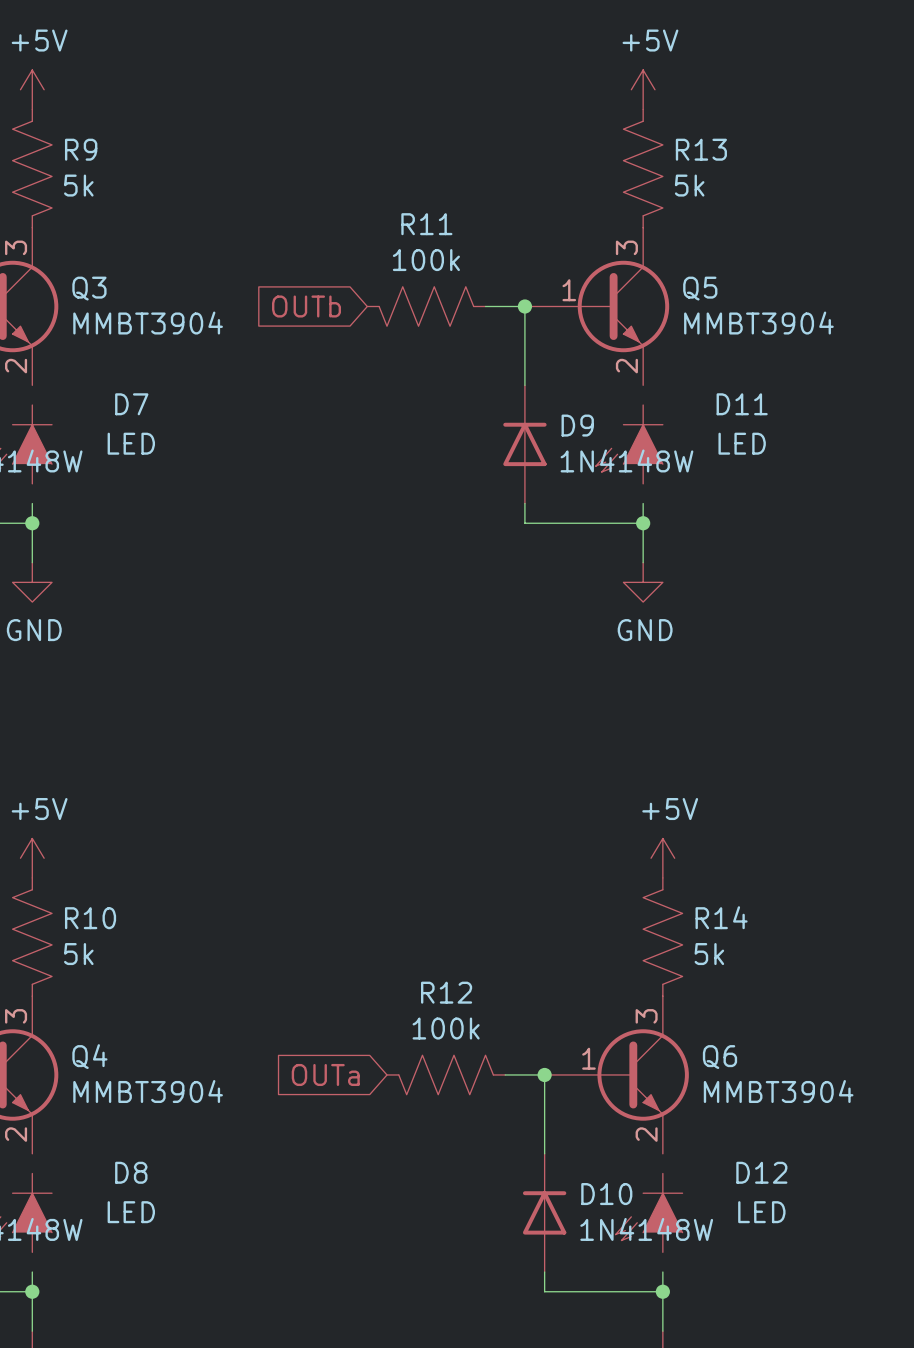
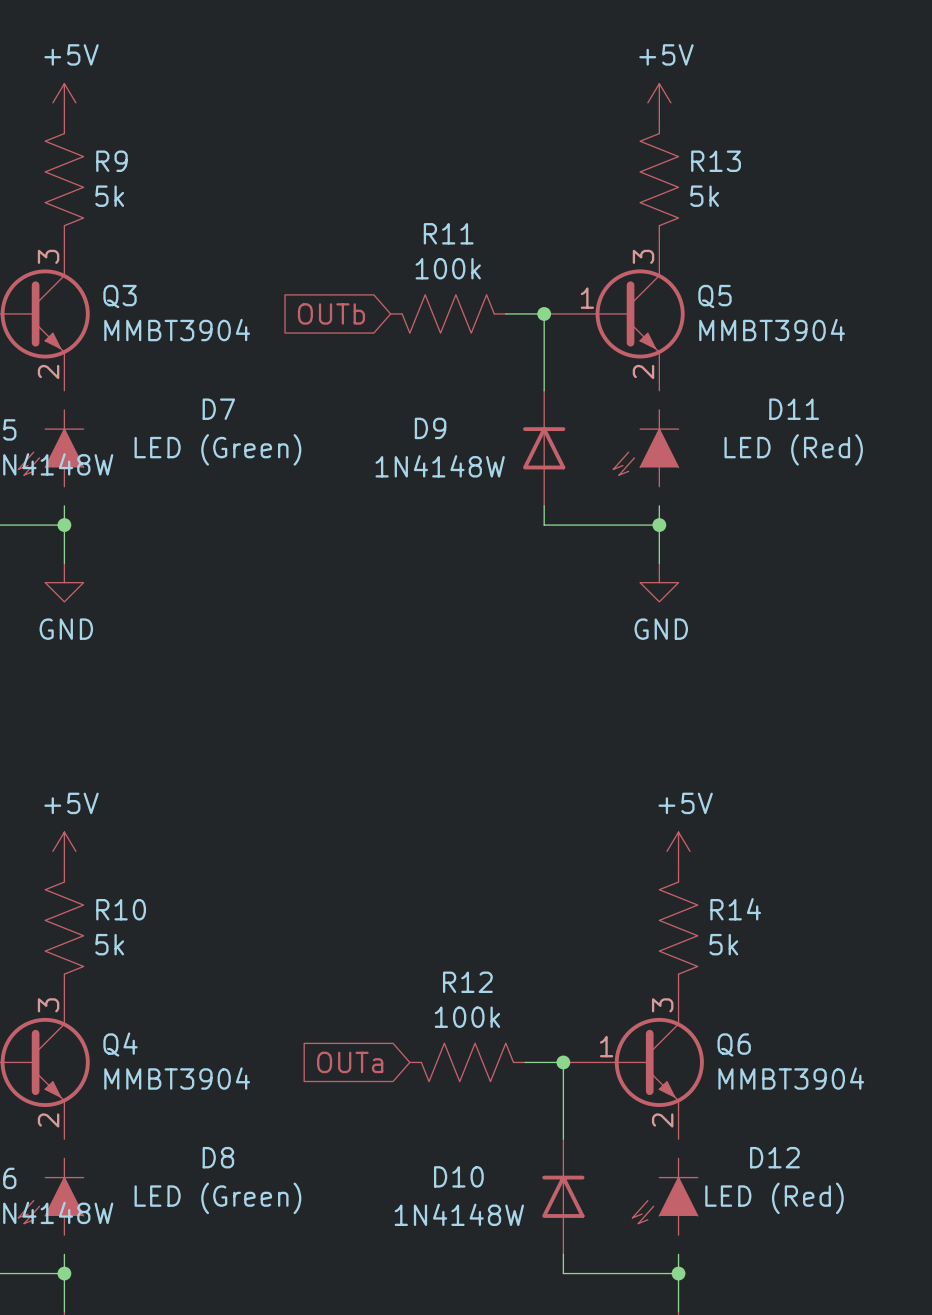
D7 name position: D7 (131, 404) -> D7 (218, 409)
D11 name position: D11 (742, 404) -> D11 (794, 409)
D9 name position: D9 (577, 425) -> D9 (430, 428)
D7 value: LED (131, 443) -> LED (Green) (217, 449)
D11 value: LED (742, 443) -> LED (Red) (793, 449)
D9 value position: 1N4148W (626, 460) -> 1N4148W (440, 466)
D8 name position: D8 (131, 1172) -> D8 (218, 1157)
D10 name position: D10 (606, 1194) -> D10 (458, 1176)
D8 value: LED (131, 1212) -> LED (Green) (217, 1198)
D12 value: LED (761, 1212) -> LED (Red) (774, 1198)
D10 value position: 1N4148W (646, 1229) -> 1N4148W (459, 1214)

